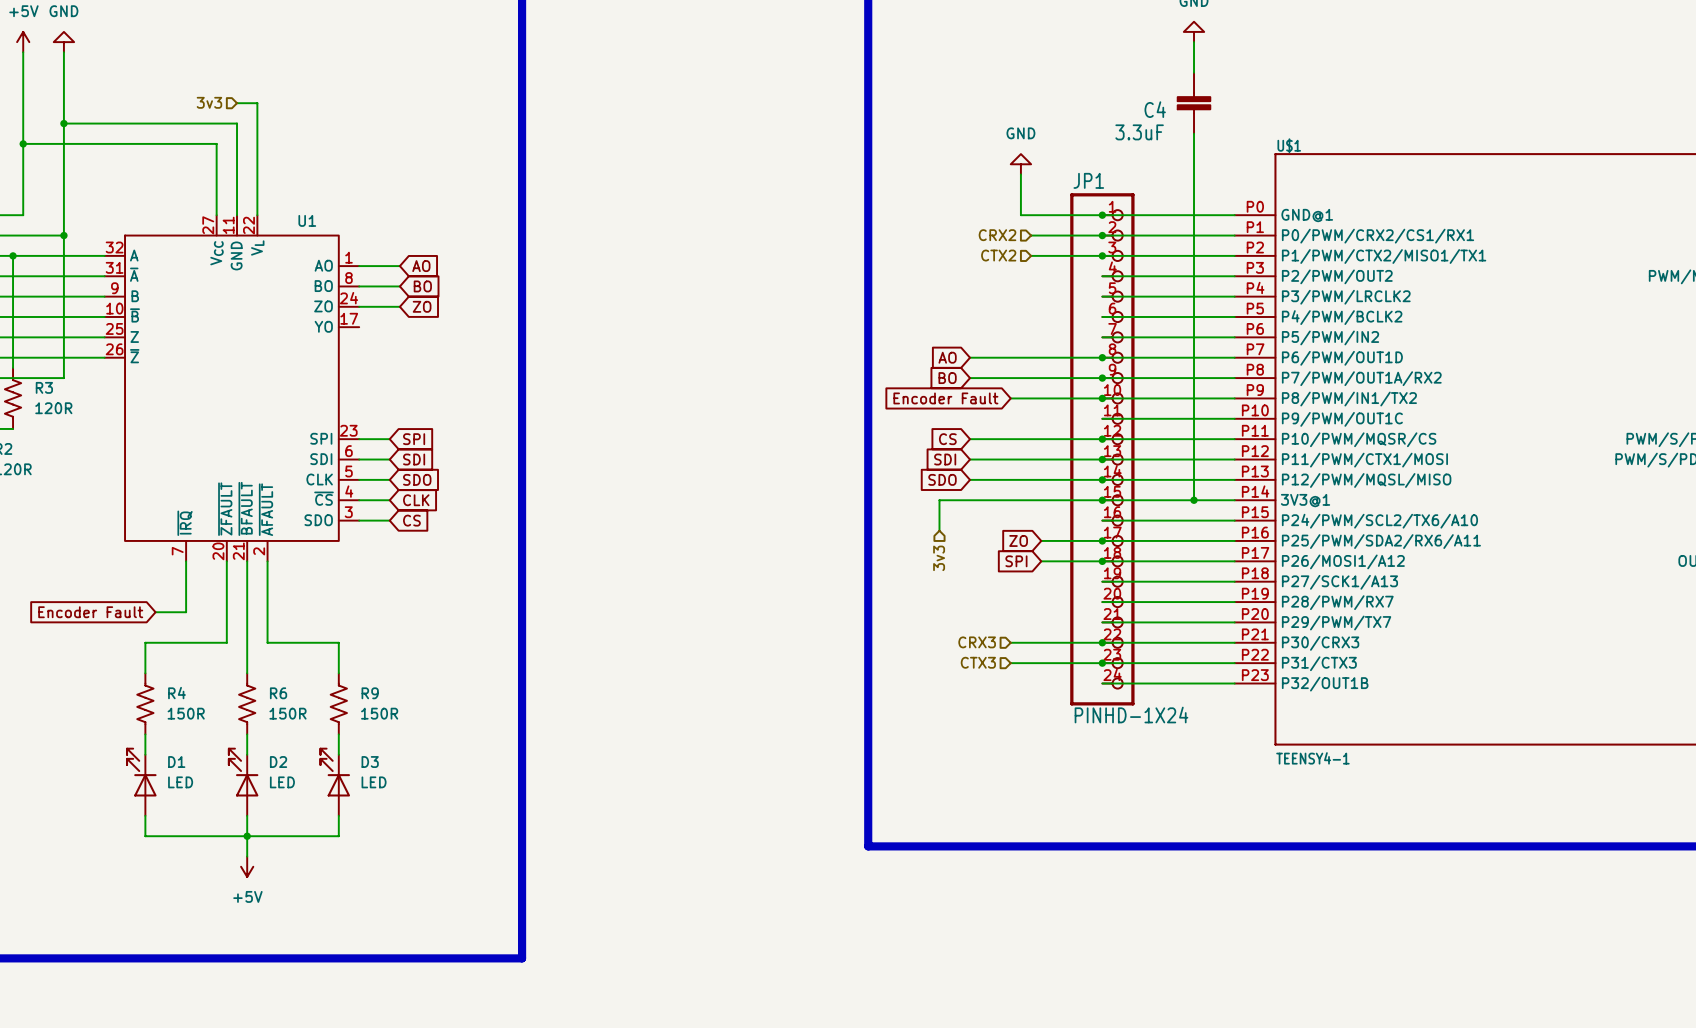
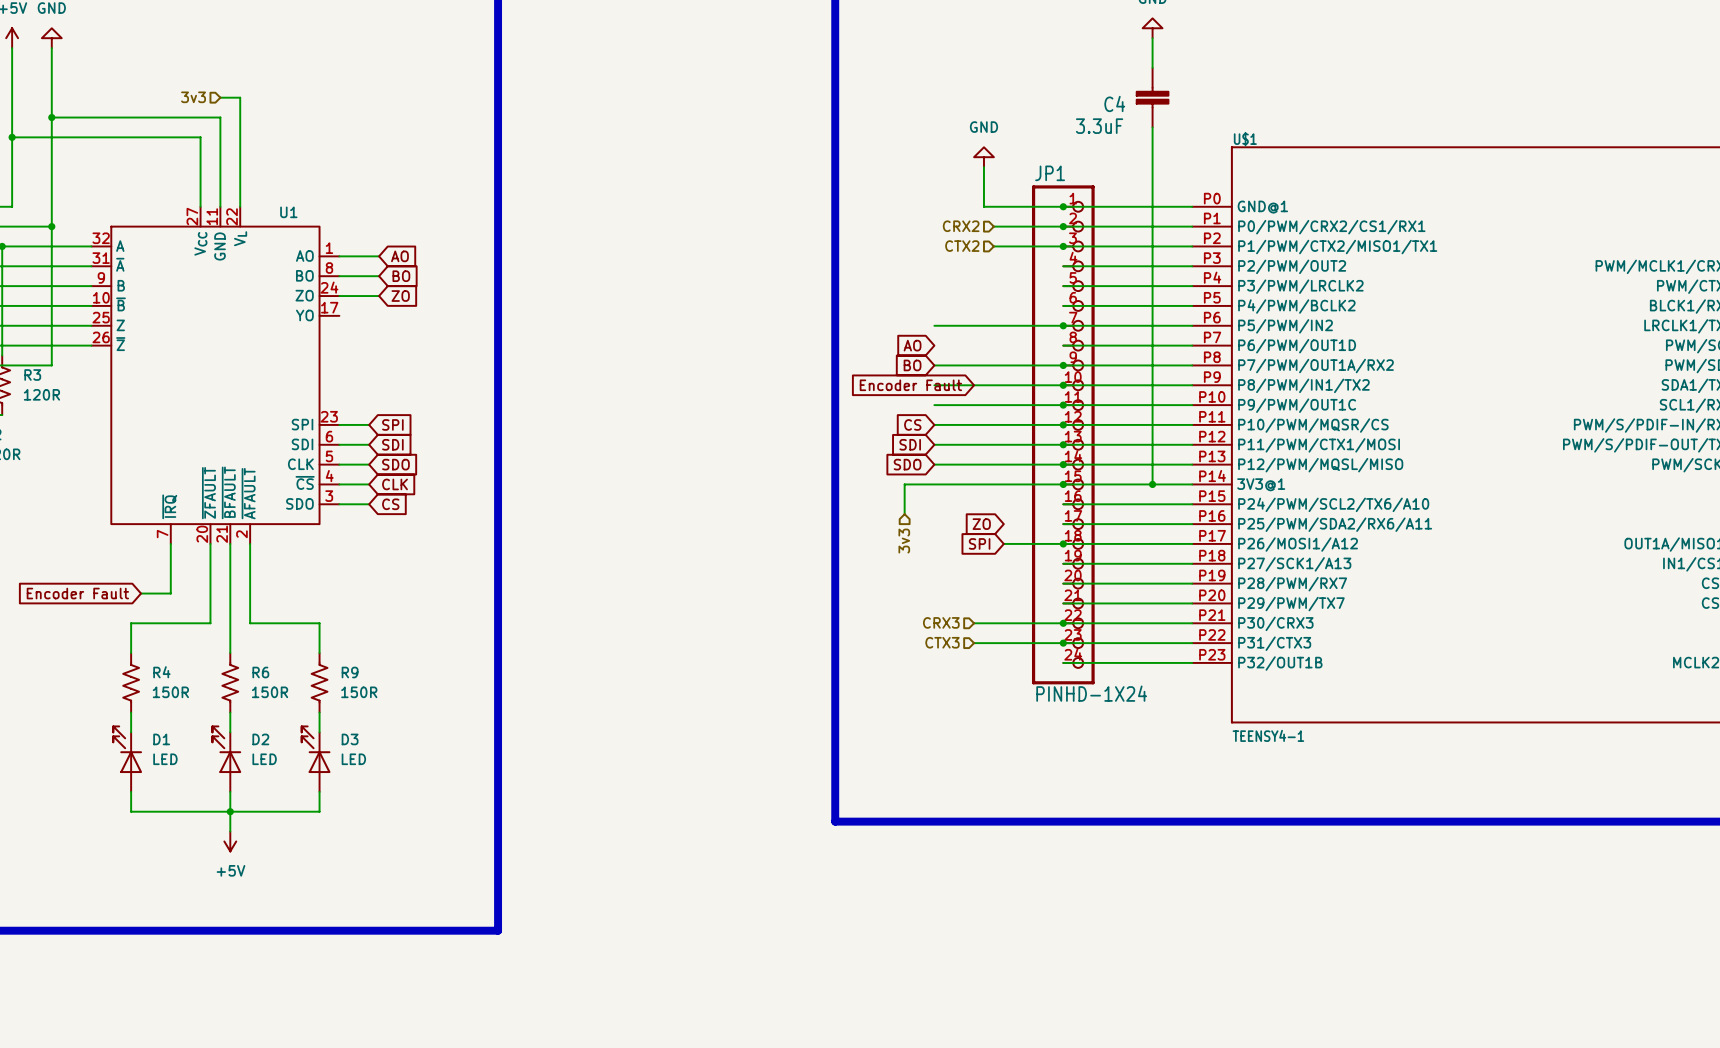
wire: (970, 357) (1102, 357) -> (934, 325) (1063, 325)
junction position: (1102, 357) -> (1063, 325)
wire: none -> (934, 385) (974, 385)
wire: none -> (934, 405) (1063, 405)
junction: none -> (1063, 405)
wire: (1041, 540) (1102, 540) -> none
junction: (1102, 540) -> none

